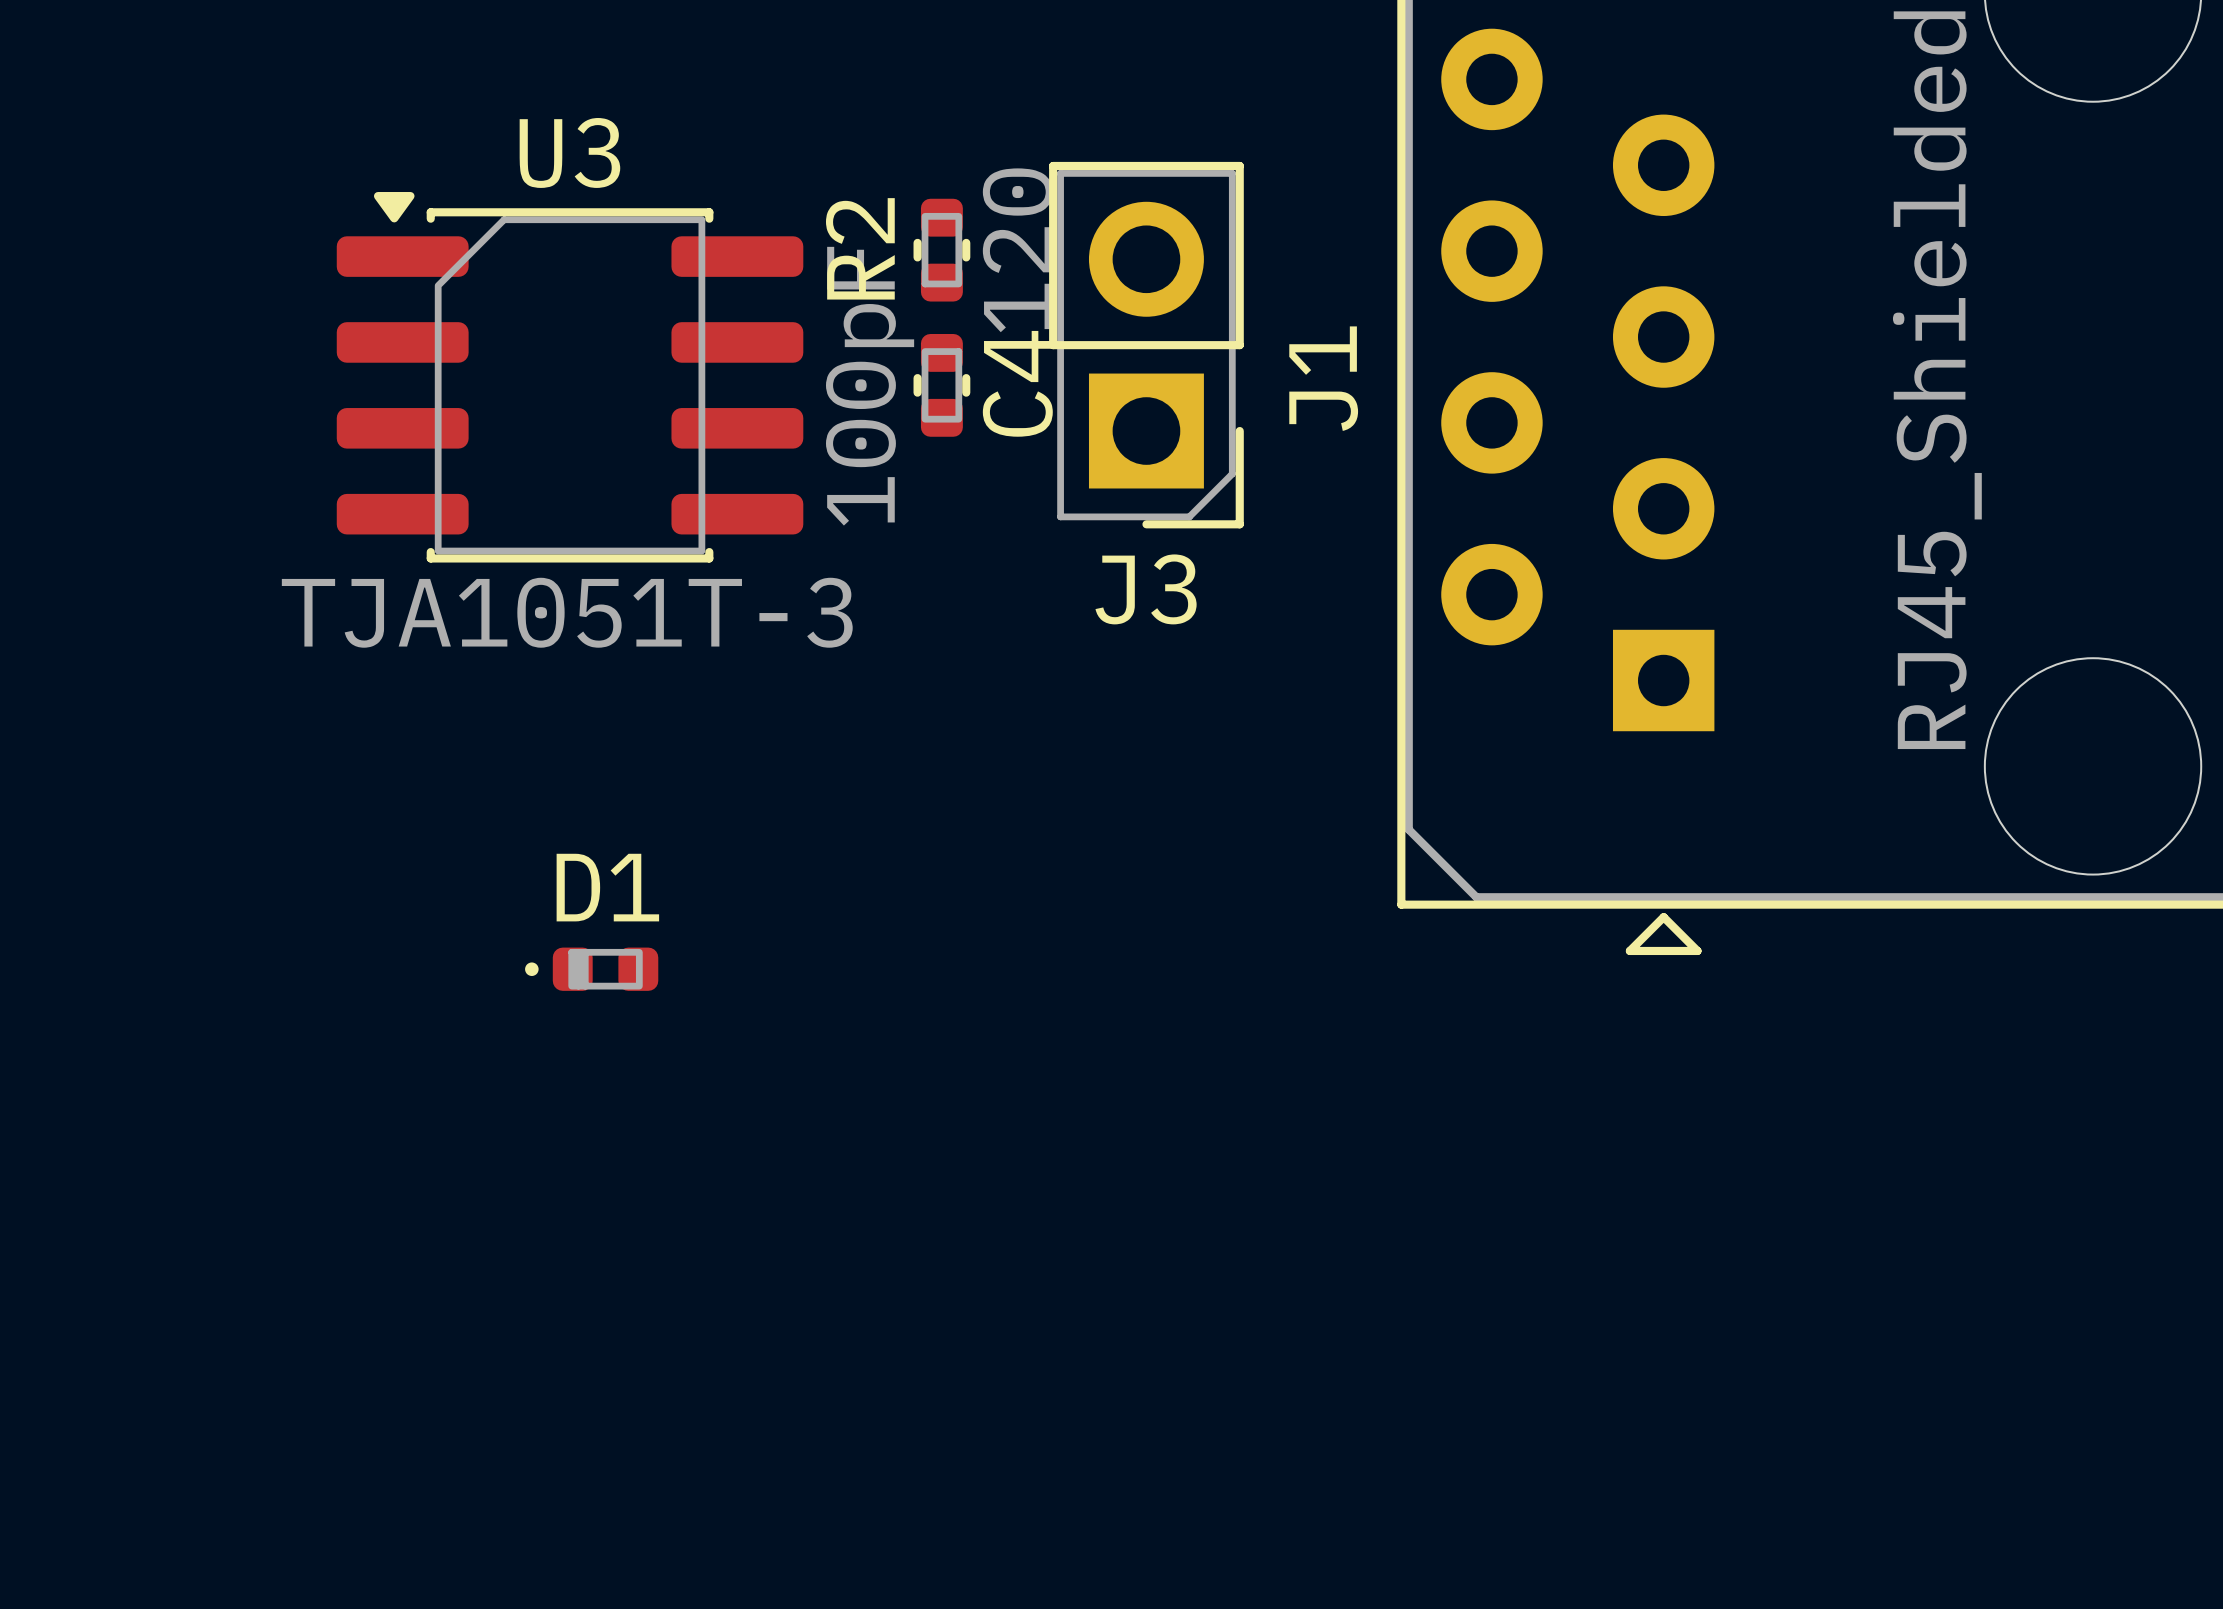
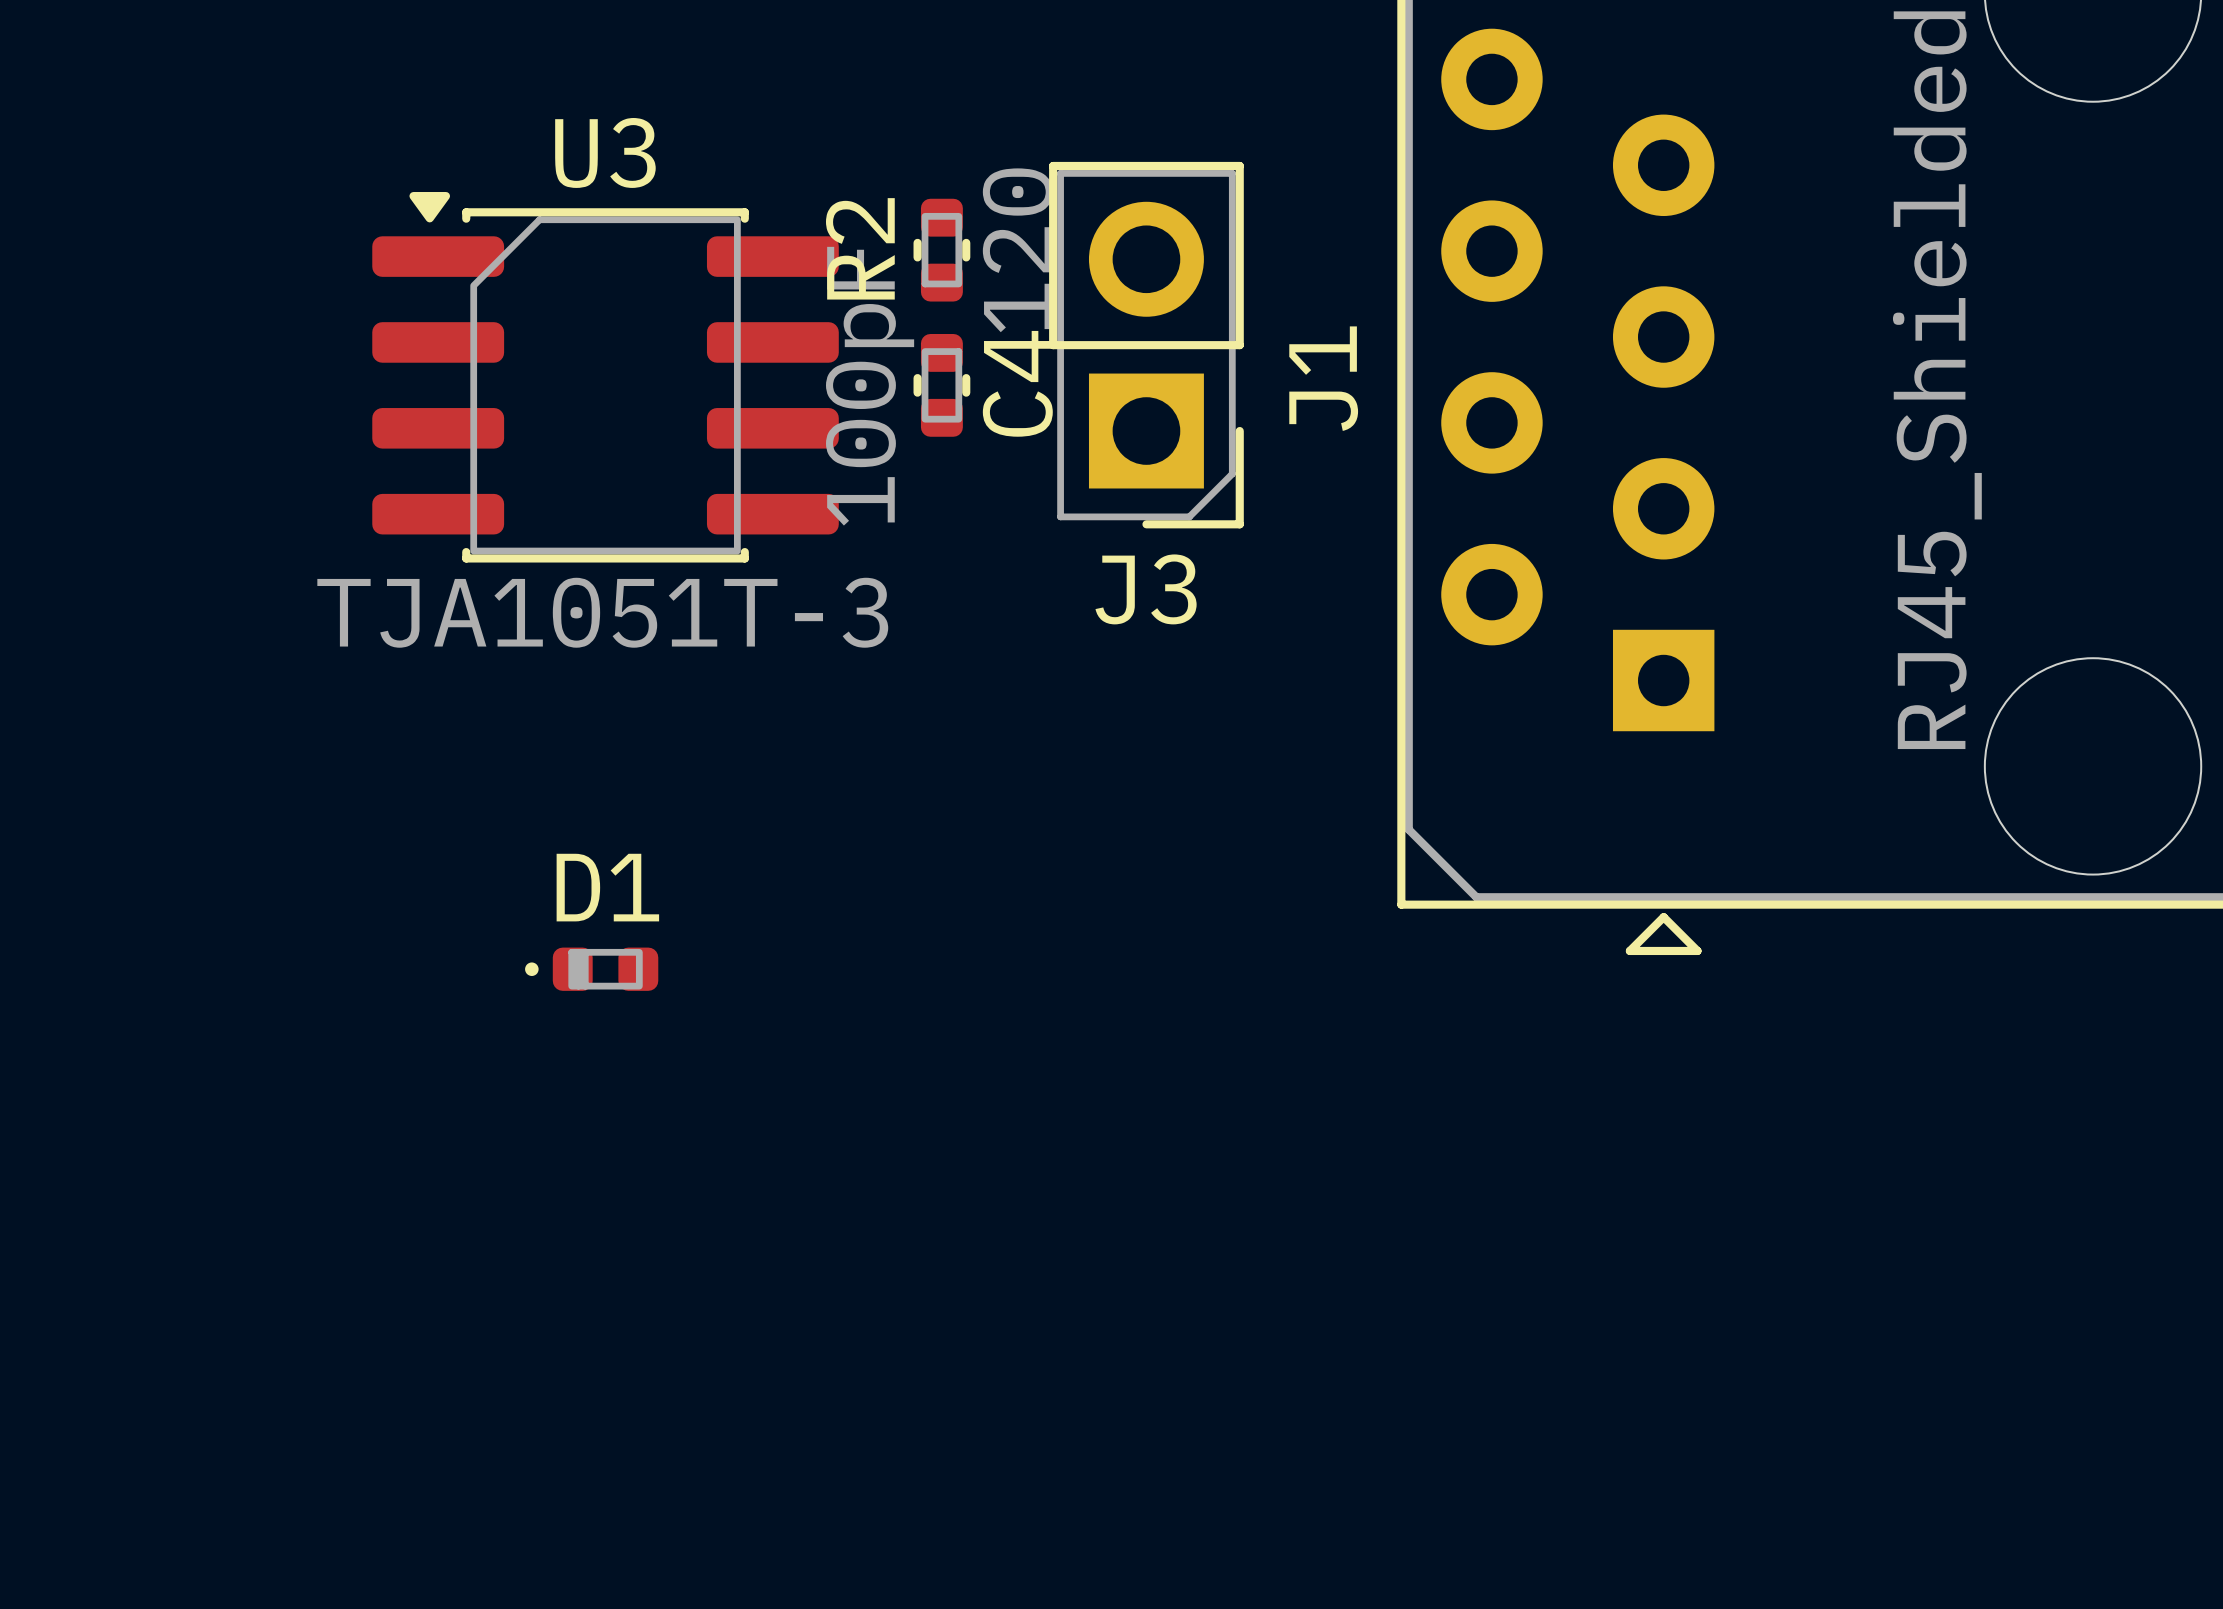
U3 position: (570, 377) -> (605, 377)

